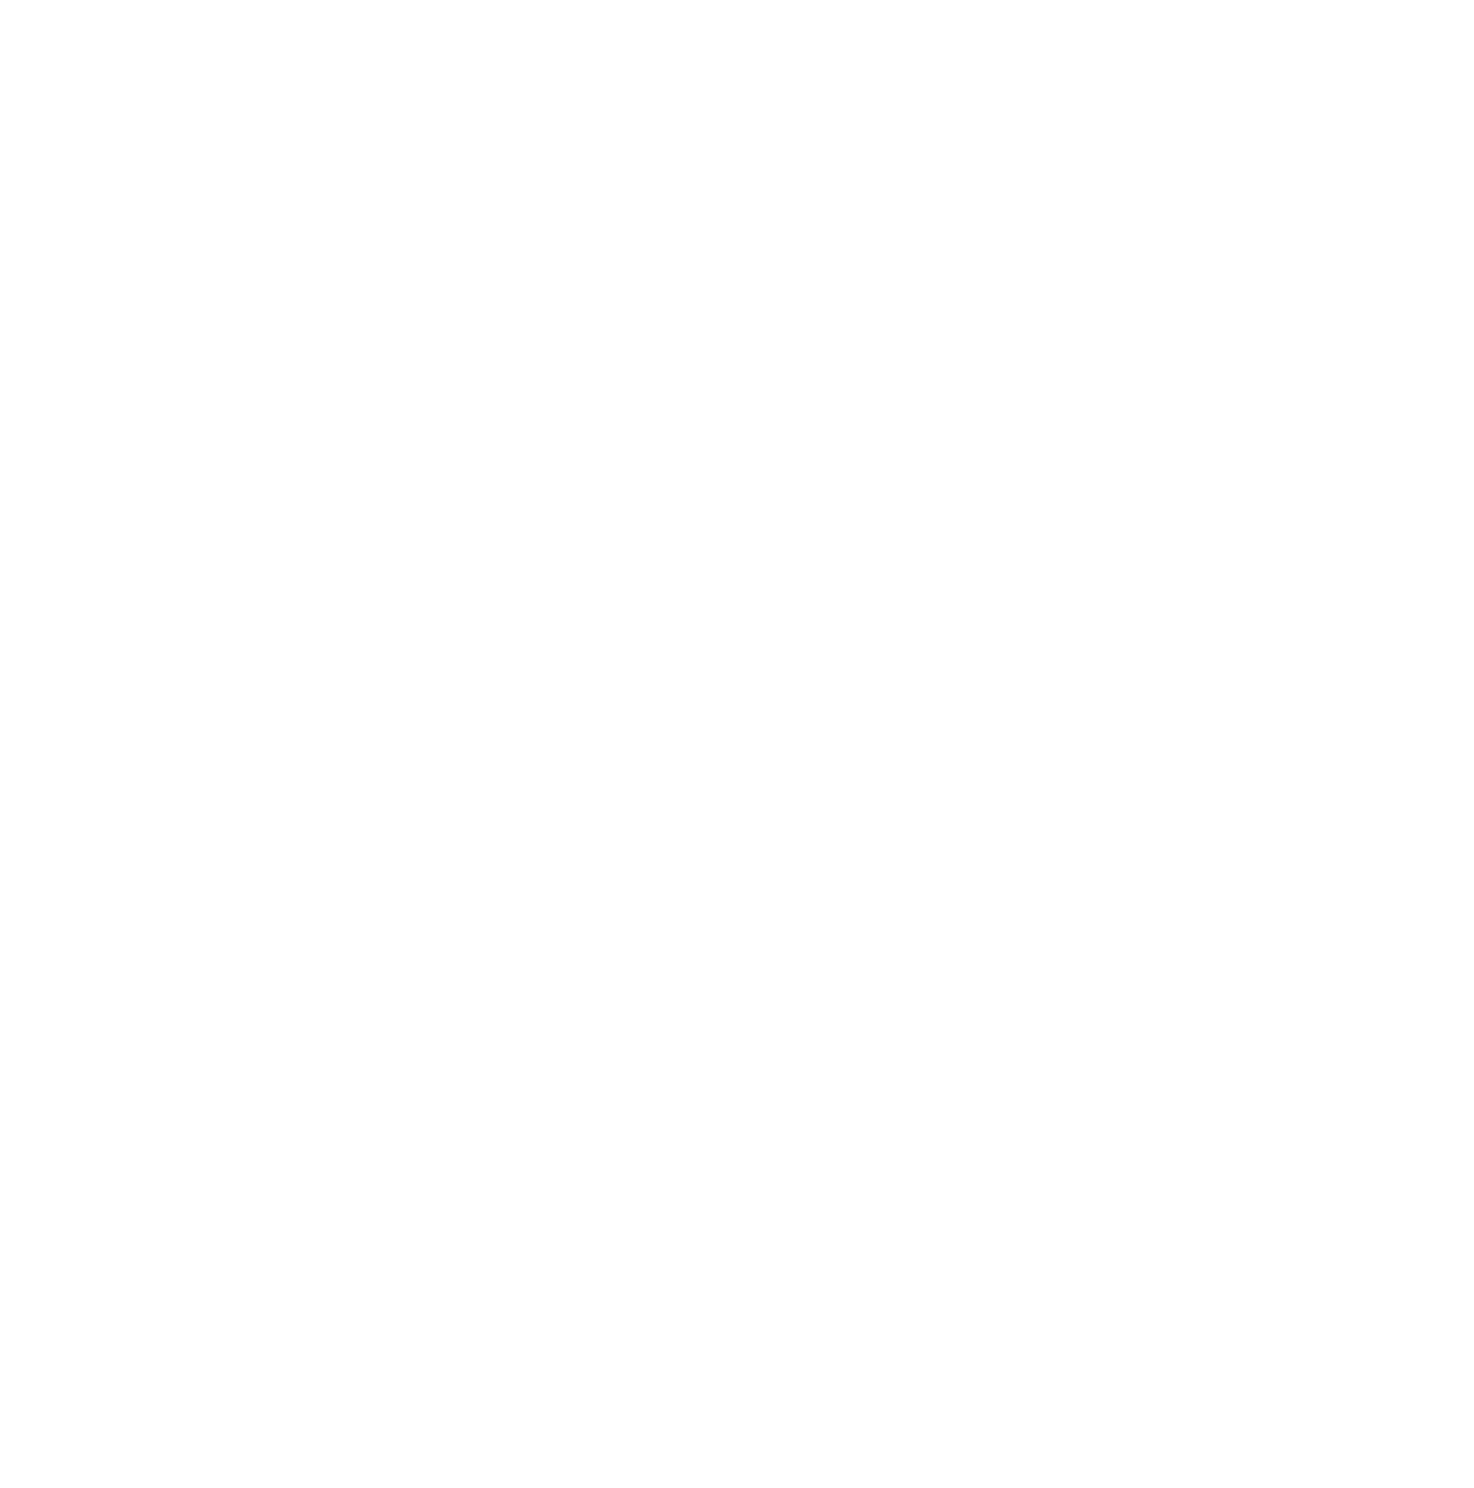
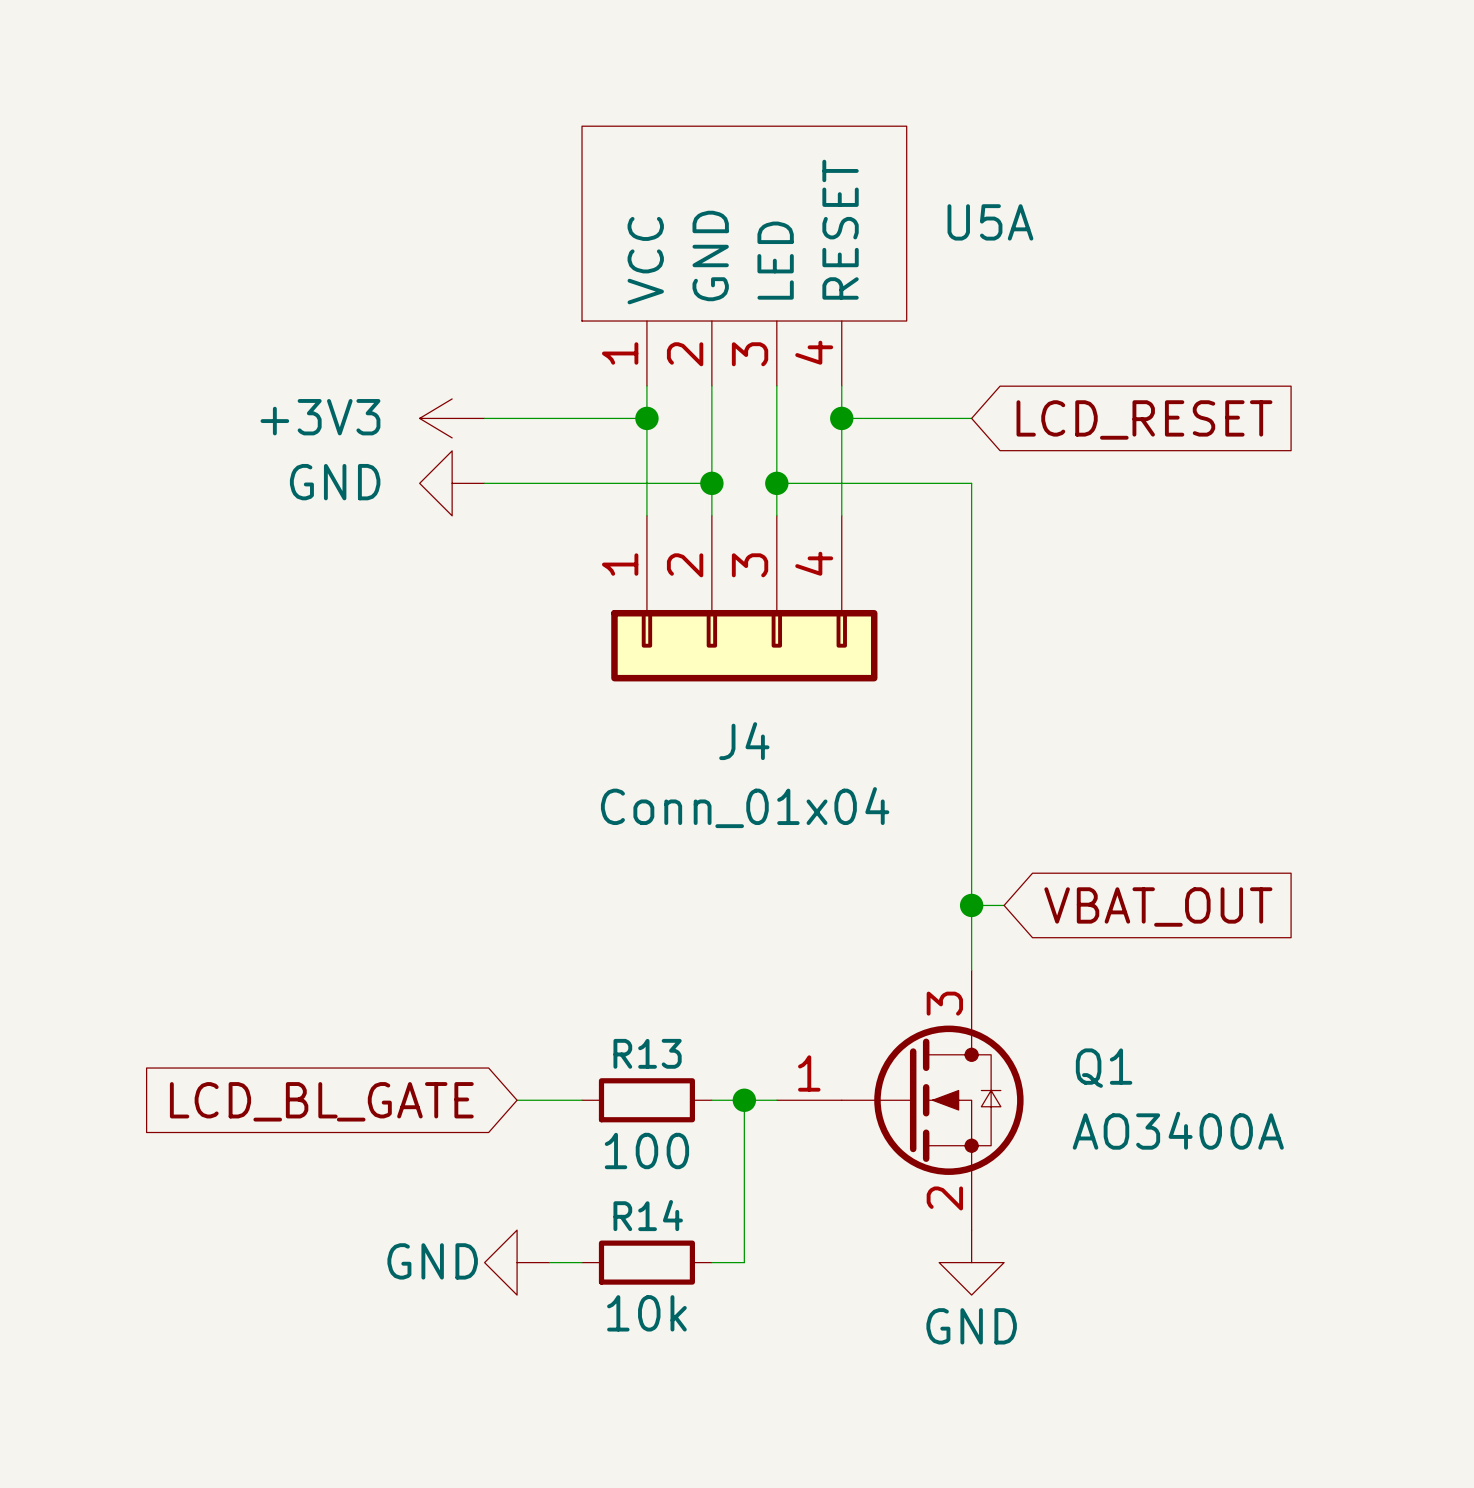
U5A: none -> (744, 256)
wire: none -> (646, 385) (646, 515)
wire: none -> (711, 385) (711, 515)
wire: none -> (776, 385) (776, 515)
wire: none -> (841, 385) (841, 515)
power symbol: none -> +3V3 (452, 418)
wire: none -> (484, 418) (646, 418)
junction: none -> (646, 418)
wire: none -> (841, 418) (971, 418)
junction: none -> (841, 418)
global label: none -> LCD_RESET (1144, 419)
power symbol: none -> GND (452, 483)
wire: none -> (484, 483) (711, 483)
junction: none -> (711, 483)
wire: none -> (776, 483) (971, 483) (971, 970)
junction: none -> (776, 483)
J4: none -> Conn_01x04 (744, 598)
wire: none -> (971, 905) (1004, 905)
junction: none -> (971, 905)
global label: none -> VBAT_OUT (1158, 906)
wire: none -> (517, 1100) (582, 1100)
R13: none -> 100 (646, 1100)
wire: none -> (711, 1100) (776, 1100)
wire: none -> (744, 1100) (744, 1262) (711, 1262)
junction: none -> (744, 1100)
Q1: none -> AO3400A (900, 1100)
global label: none -> LCD_BL_GATE (321, 1101)
power symbol: none -> GND (517, 1262)
wire: none -> (549, 1262) (582, 1262)
R14: none -> 10k (646, 1262)
power symbol: none -> GND (971, 1262)

